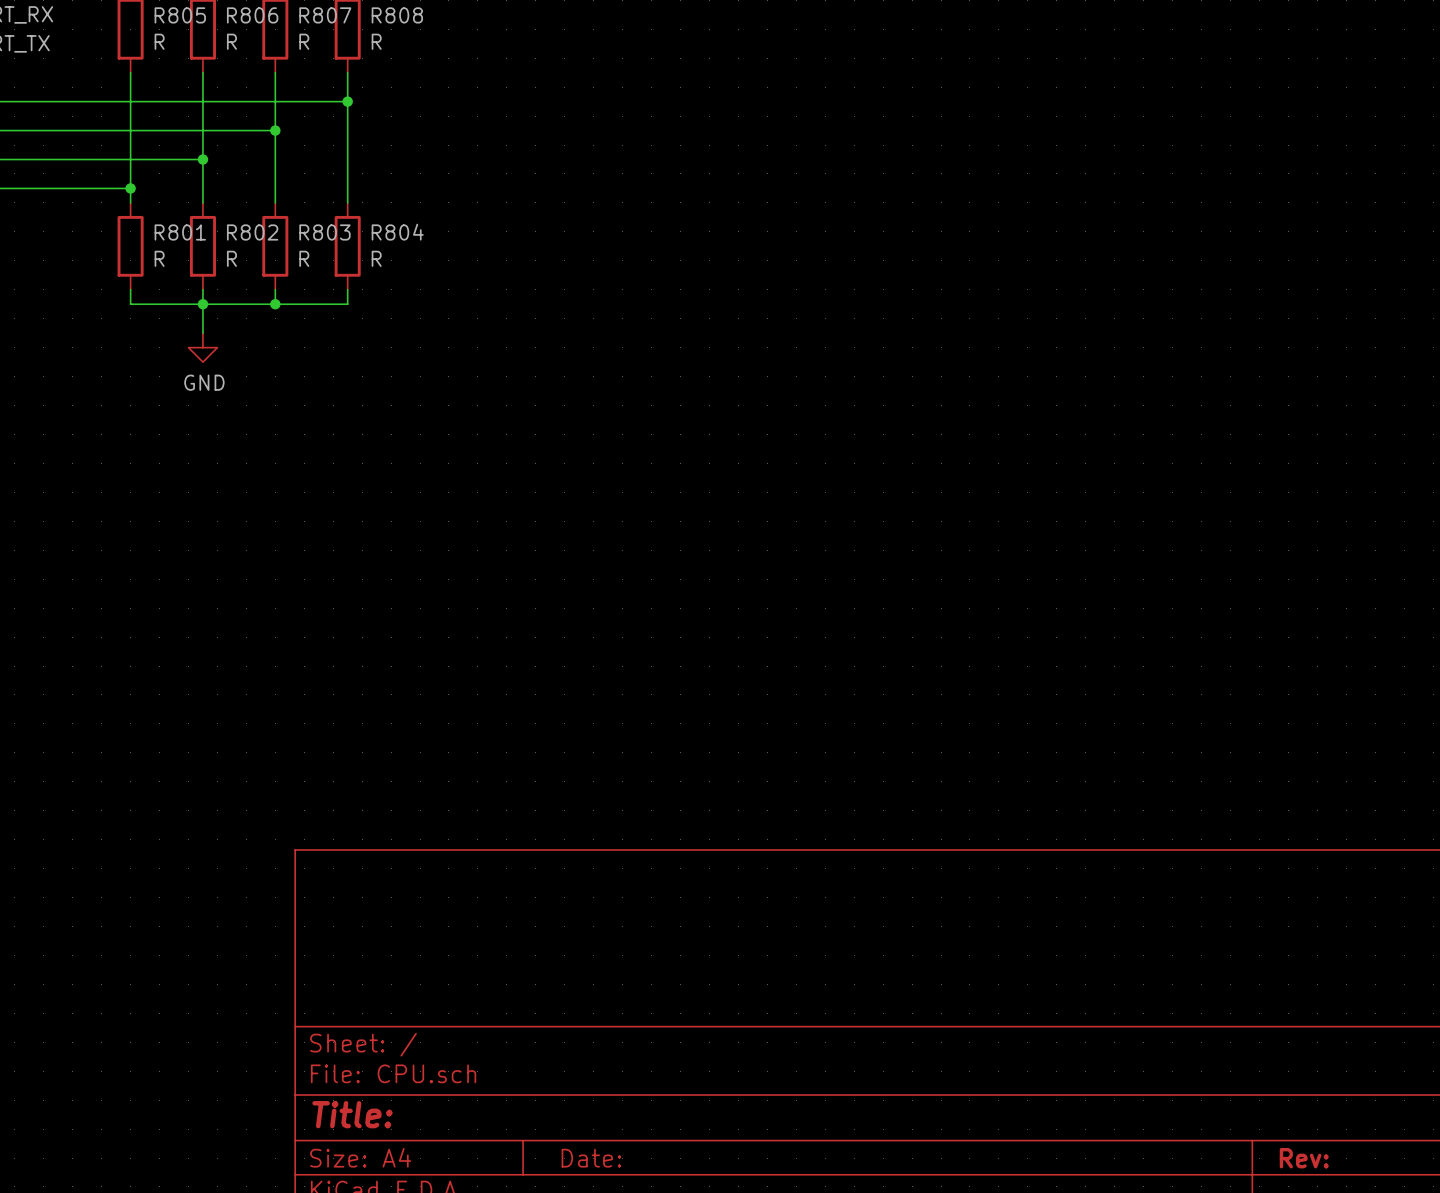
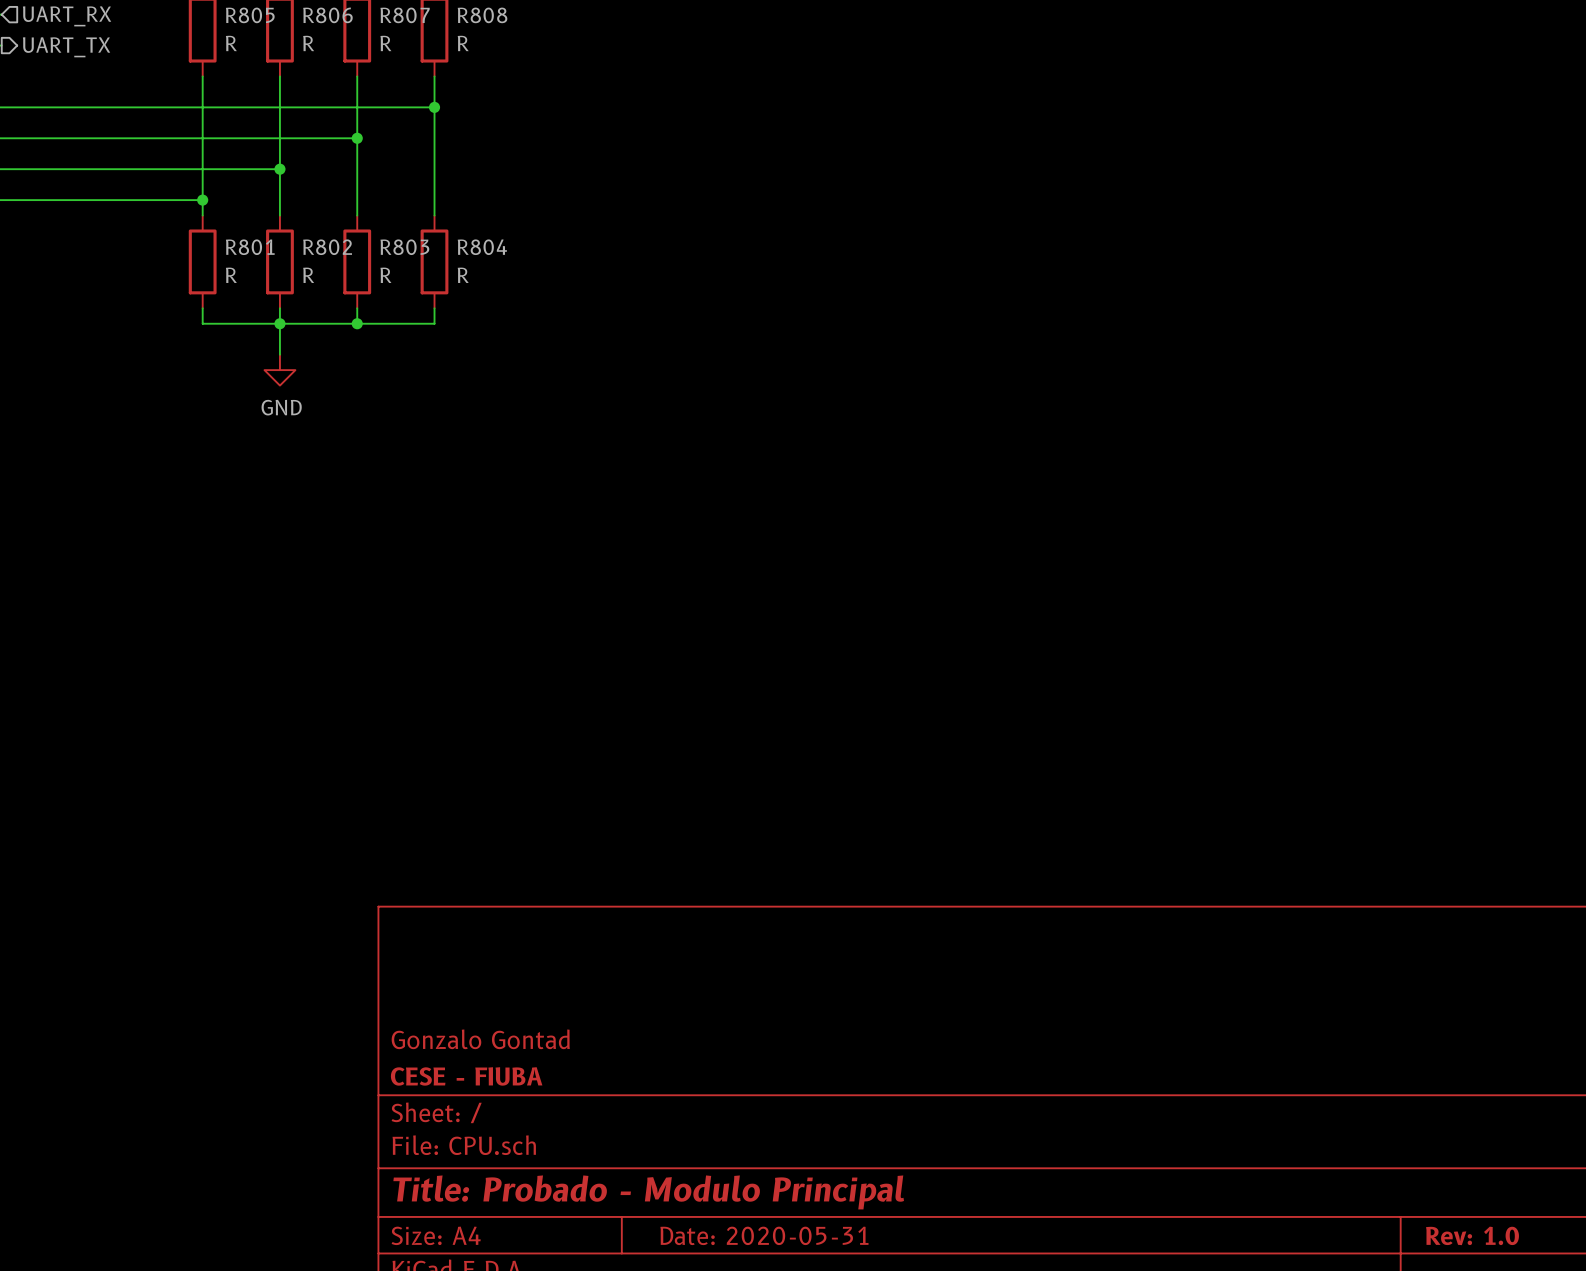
title block: none -> Gonzalo Gontad (480, 1039)
title block: none -> CESE - FIUBA (466, 1076)
title block: Title: (352, 1114) -> Title: Probado - Modulo Principal (648, 1192)
title block: Date: (591, 1158) -> Date: 2020-05-31 (764, 1235)
title block: Rev: (1304, 1158) -> Rev: 1.0 (1472, 1235)

